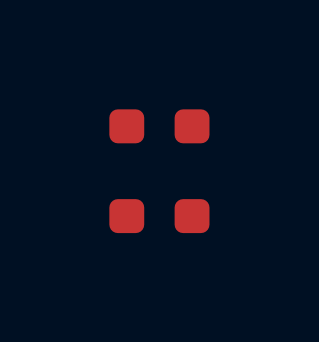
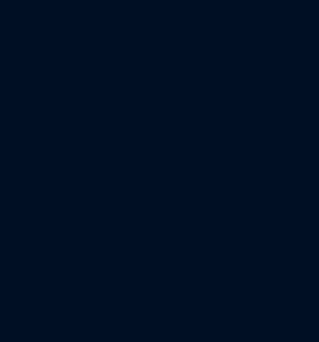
part: (159, 126) -> none
part: (159, 216) -> none

